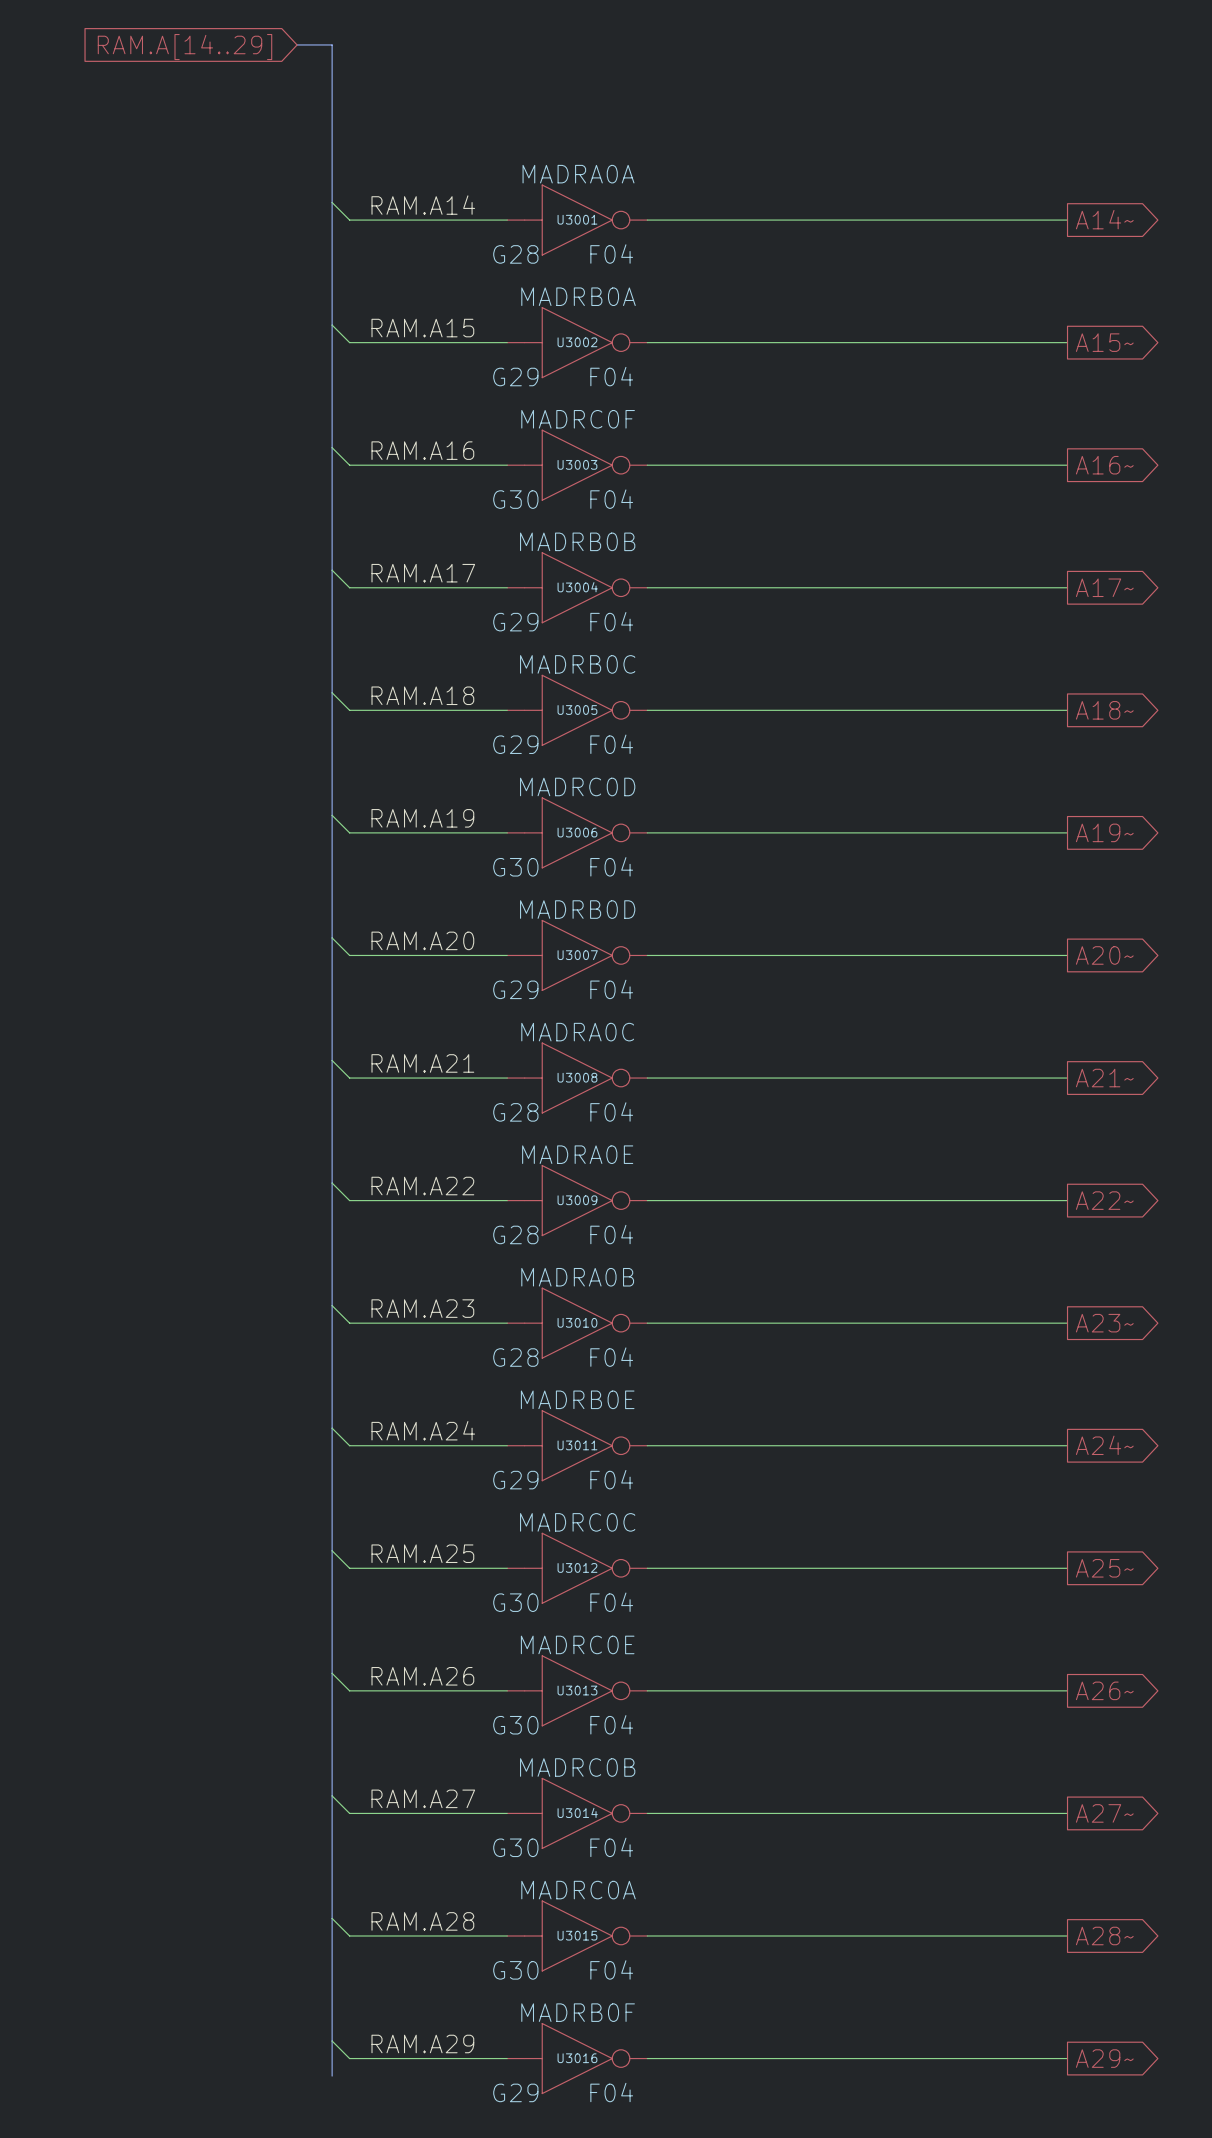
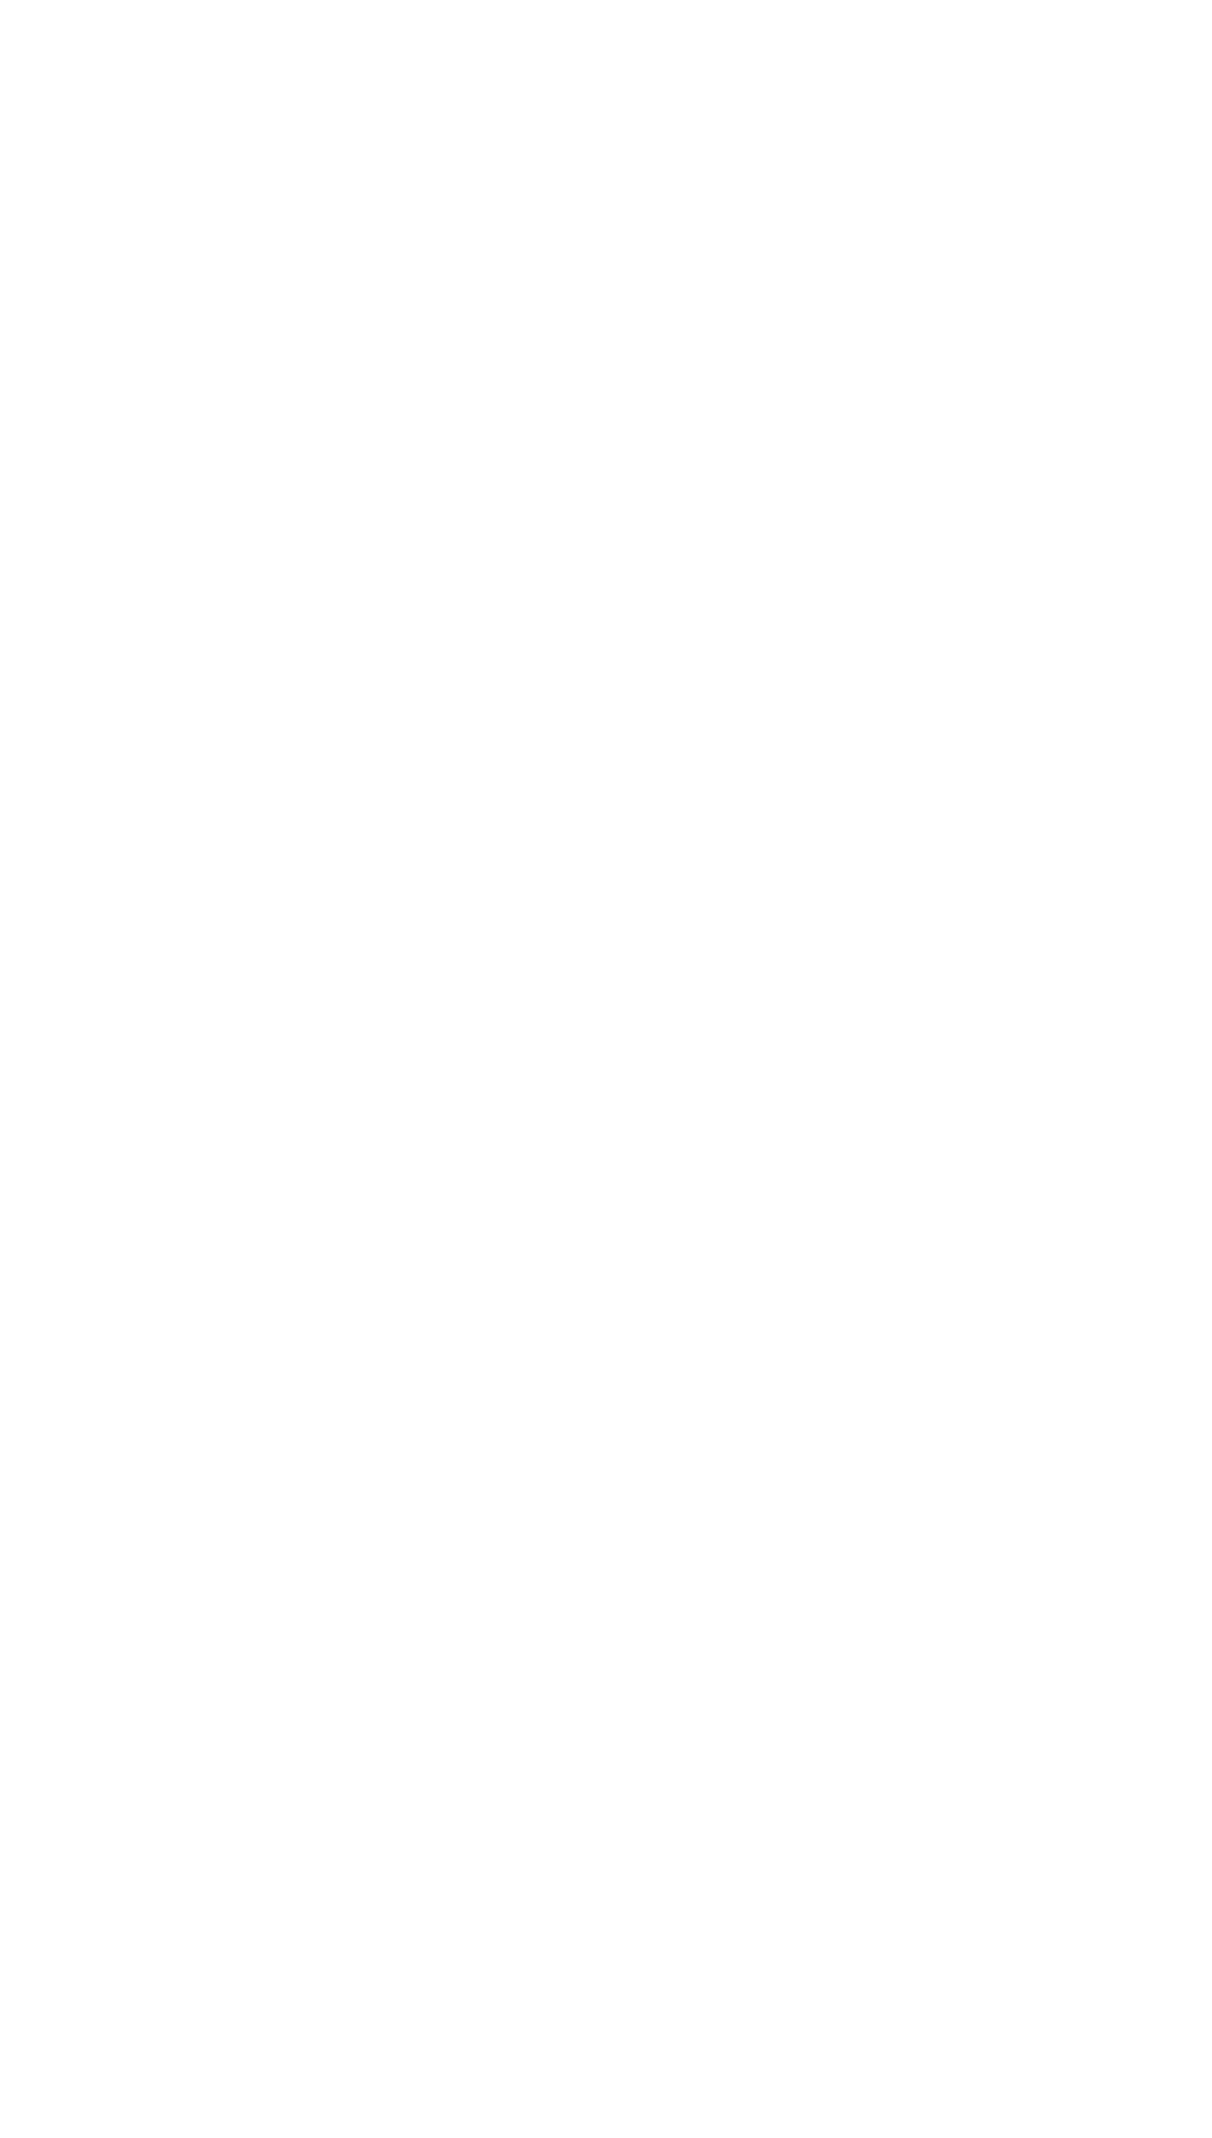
bus: (297, 44) (332, 44) (332, 2076) -> none
global label: RAM.A[14..29] (185, 47) -> none
wire: (332, 202) (349, 220) (507, 220) -> none
label: RAM.A14 (423, 205) -> none
global label: A14~ (1104, 219) -> none
U3001: F04 (577, 220) -> none
wire: (647, 220) (1067, 220) -> none
wire: (332, 325) (349, 342) (507, 342) -> none
label: RAM.A15 (422, 328) -> none
U3002: F04 (577, 342) -> none
wire: (647, 342) (1067, 342) -> none
global label: A15~ (1104, 342) -> none
wire: (332, 447) (349, 465) (507, 465) -> none
label: RAM.A16 (422, 450) -> none
U3003: F04 (577, 465) -> none
wire: (647, 465) (1067, 465) -> none
global label: A16~ (1104, 465) -> none
wire: (332, 570) (349, 587) (507, 587) -> none
label: RAM.A17 (423, 573) -> none
U3004: F04 (577, 587) -> none
wire: (647, 587) (1067, 587) -> none
global label: A17~ (1104, 587) -> none
wire: (332, 692) (349, 710) (507, 710) -> none
label: RAM.A18 (422, 695) -> none
U3005: F04 (577, 710) -> none
wire: (647, 710) (1067, 710) -> none
global label: A18~ (1104, 710) -> none
wire: (332, 815) (349, 832) (507, 832) -> none
label: RAM.A19 (422, 818) -> none
U3006: F04 (577, 832) -> none
wire: (647, 832) (1067, 832) -> none
global label: A19~ (1104, 832) -> none
wire: (332, 937) (349, 955) (507, 955) -> none
label: RAM.A20 (422, 940) -> none
U3007: F04 (577, 955) -> none
wire: (647, 955) (1067, 955) -> none
global label: A20~ (1104, 955) -> none
wire: (332, 1060) (349, 1078) (507, 1078) -> none
label: RAM.A21 (422, 1063) -> none
U3008: F04 (577, 1078) -> none
wire: (647, 1078) (1067, 1078) -> none
global label: A21~ (1104, 1078) -> none
wire: (332, 1183) (349, 1200) (507, 1200) -> none
label: RAM.A22 (422, 1186) -> none
U3009: F04 (577, 1200) -> none
wire: (647, 1200) (1067, 1200) -> none
global label: A22~ (1104, 1200) -> none
wire: (332, 1305) (349, 1323) (507, 1323) -> none
label: RAM.A23 (422, 1308) -> none
U3010: F04 (577, 1323) -> none
wire: (647, 1323) (1067, 1323) -> none
global label: A23~ (1104, 1323) -> none
wire: (332, 1428) (349, 1445) (507, 1445) -> none
label: RAM.A24 (423, 1430) -> none
U3011: F04 (577, 1445) -> none
wire: (647, 1445) (1067, 1445) -> none
global label: A24~ (1104, 1445) -> none
wire: (332, 1550) (349, 1568) (507, 1568) -> none
label: RAM.A25 (422, 1553) -> none
U3012: F04 (577, 1568) -> none
wire: (647, 1568) (1067, 1568) -> none
global label: A25~ (1104, 1568) -> none
wire: (332, 1673) (349, 1690) (507, 1690) -> none
label: RAM.A26 (422, 1676) -> none
U3013: F04 (577, 1690) -> none
wire: (647, 1690) (1067, 1690) -> none
global label: A26~ (1104, 1690) -> none
wire: (332, 1795) (349, 1813) (507, 1813) -> none
label: RAM.A27 (423, 1798) -> none
U3014: F04 (577, 1813) -> none
wire: (647, 1813) (1067, 1813) -> none
global label: A27~ (1104, 1813) -> none
wire: (332, 1918) (349, 1935) (507, 1935) -> none
label: RAM.A28 (422, 1921) -> none
U3015: F04 (577, 1935) -> none
wire: (647, 1935) (1067, 1935) -> none
global label: A28~ (1104, 1935) -> none
wire: (332, 2041) (349, 2058) (507, 2058) -> none
label: RAM.A29 (422, 2043) -> none
U3016: F04 (577, 2058) -> none
wire: (647, 2058) (1067, 2058) -> none
global label: A29~ (1104, 2058) -> none

